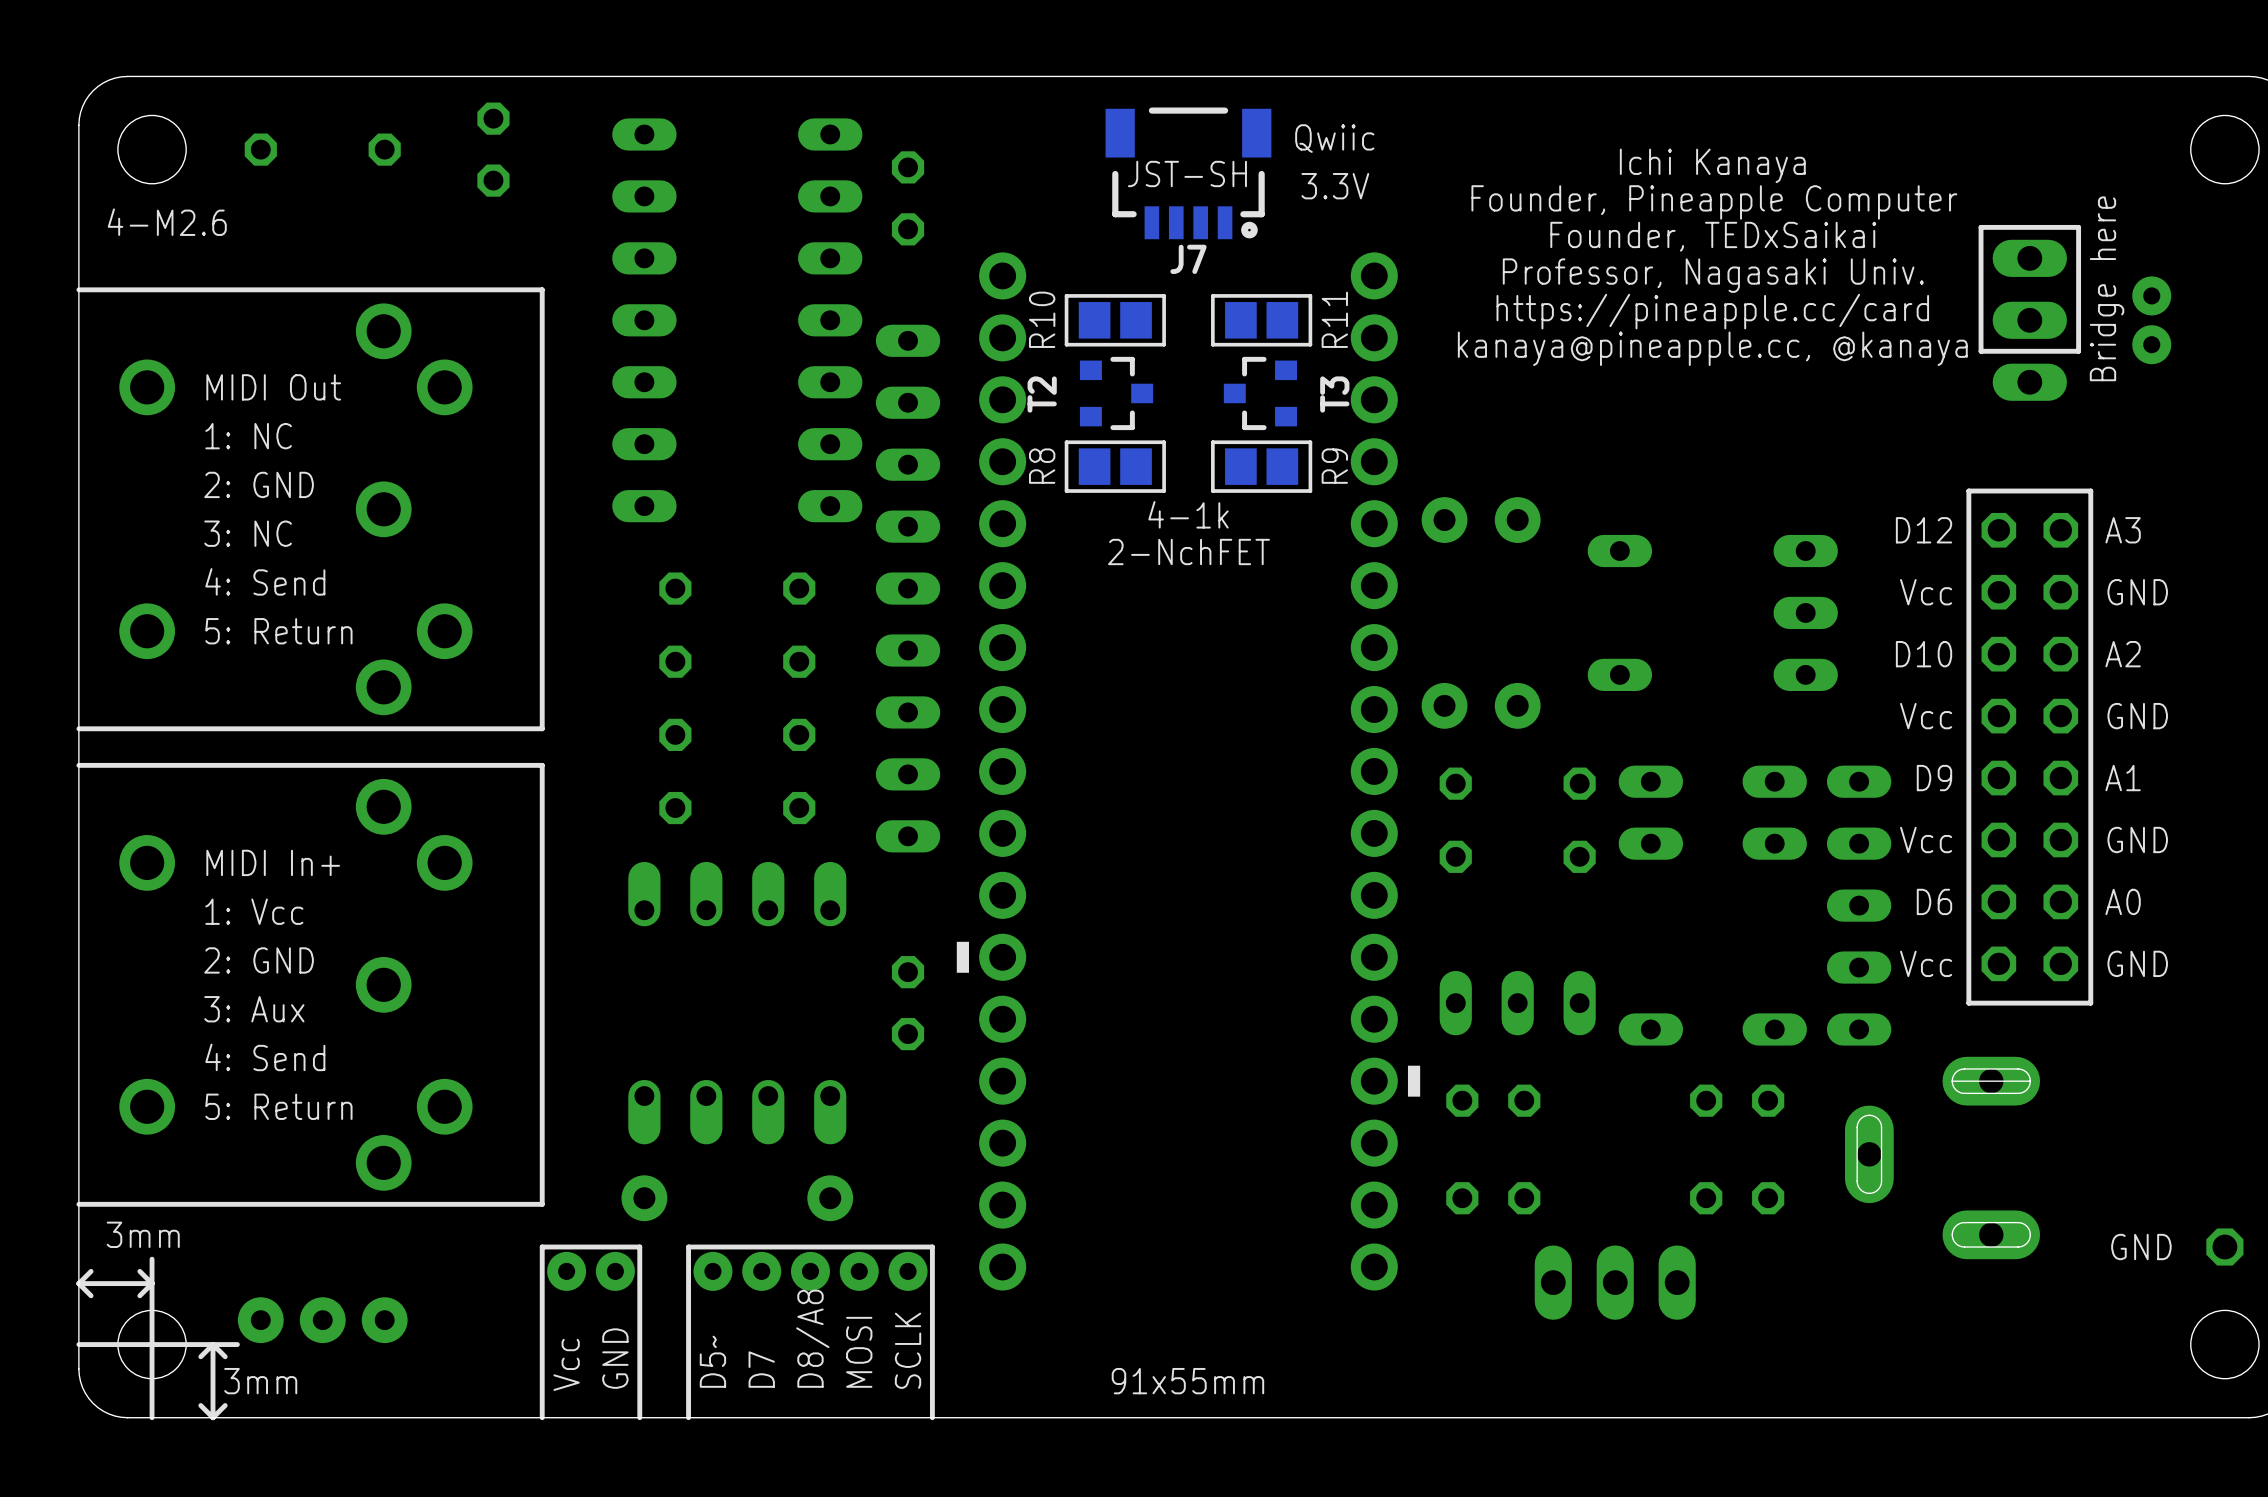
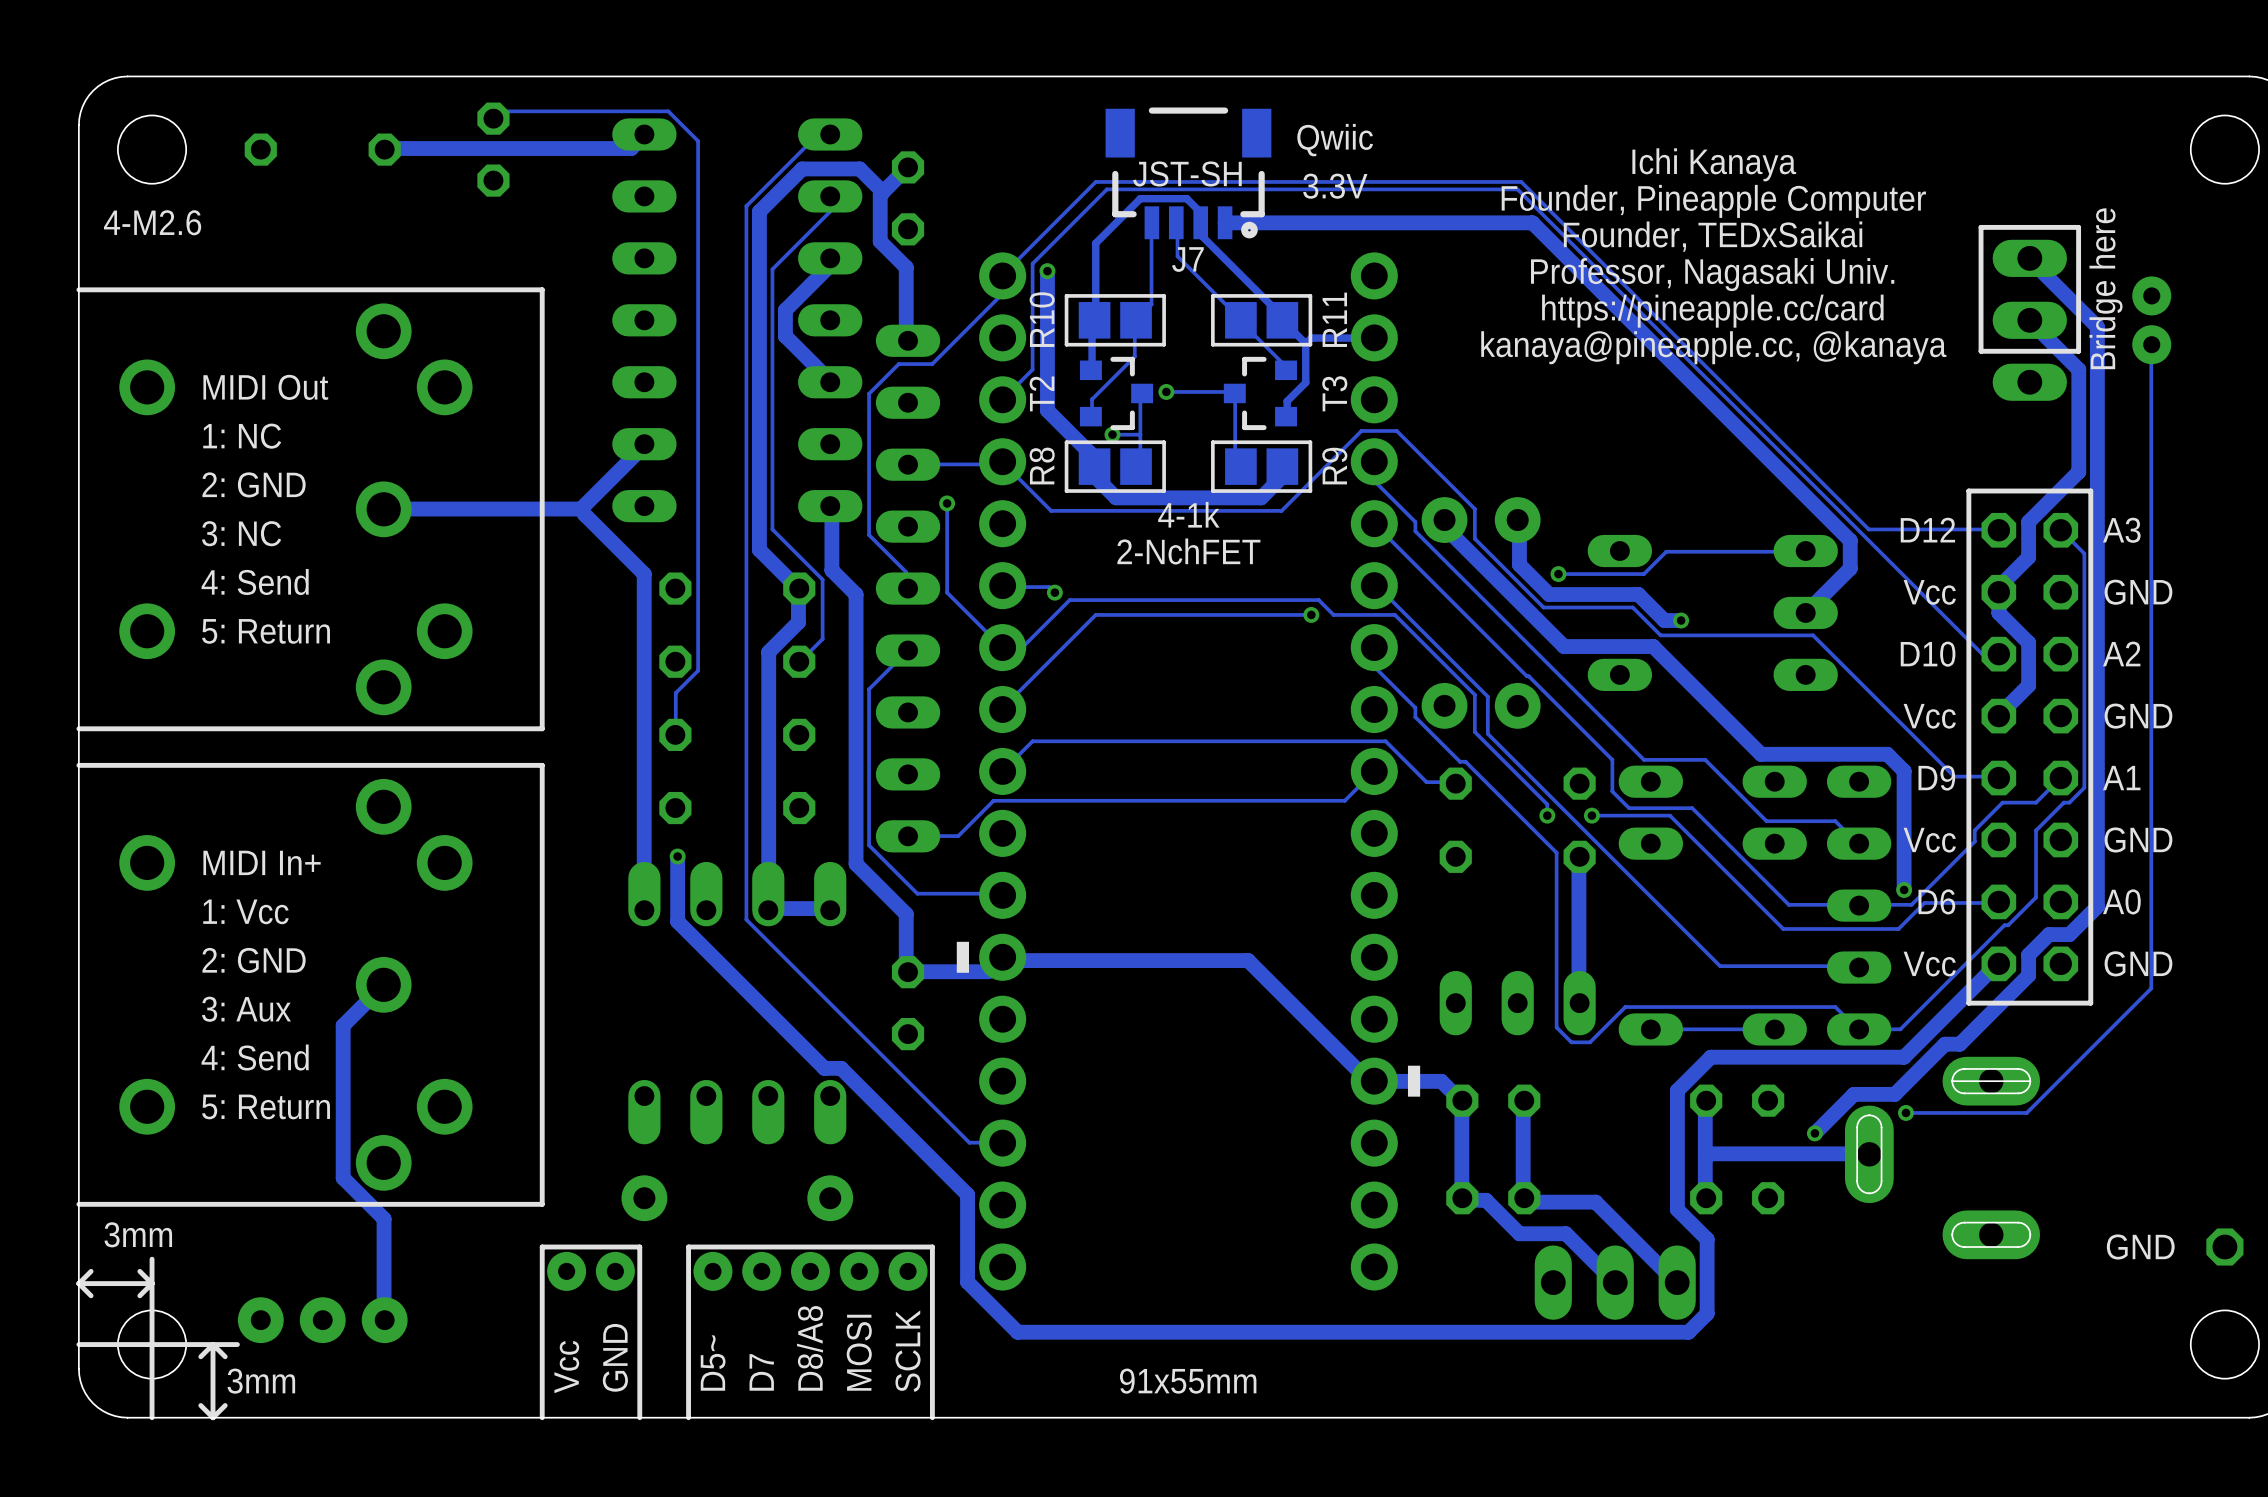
track: none -> (493, 118) (499, 111) (668, 111) (698, 141) (698, 670) (675, 692) (675, 734)
track: none -> (644, 134) (631, 148) (384, 149)
track: none -> (830, 134) (817, 135) (746, 206) (746, 919) (969, 1142) (1002, 1143)
track: none -> (908, 167) (880, 194) (880, 241) (906, 267) (906, 339) (908, 340)
track: none -> (883, 192) (859, 168) (802, 168) (759, 211) (759, 549) (799, 588) (798, 622) (768, 652) (768, 910) (768, 908) (830, 908) (830, 910)
track: none -> (830, 196) (830, 211) (772, 269) (772, 529) (822, 579) (822, 639) (799, 661)
track: none -> (1151, 222) (1151, 304) (1134, 321) (1134, 356) (1092, 399) (1090, 416)
track: none -> (1176, 222) (1177, 256) (1285, 365) (1286, 370)
track: none -> (1225, 222) (1532, 222) (1850, 540) (1850, 568) (1805, 612)
track: none -> (830, 258) (830, 265) (785, 310) (785, 336) (830, 382)
track: none -> (2029, 258) (2097, 326) (2097, 906) (2069, 934) (2049, 934) (2028, 955) (2028, 975) (1959, 1044) (1945, 1044) (1894, 1094) (1853, 1094) (1814, 1133)
track: none -> (1047, 271) (1047, 410) (1090, 453) (1090, 460) (1095, 468) (1095, 477) (1116, 497) (1261, 497) (1281, 477) (1282, 466)
via: none -> (1047, 271)
track: none -> (2029, 320) (2078, 369) (2078, 471) (2028, 522) (2028, 557) (2000, 585) (1998, 592)
track: none -> (1374, 337) (1311, 338) (1305, 343)
track: none -> (1305, 343) (1305, 382) (1287, 401) (1286, 416)
track: none -> (1305, 343) (1282, 320) (1283, 317) (1201, 235) (1199, 211) (1186, 198) (1140, 198) (1095, 243) (1095, 317) (1092, 323) (1090, 370)
track: none -> (2151, 344) (2151, 988) (2026, 1112) (1905, 1112)
track: none -> (1166, 391) (1234, 393)
via: none -> (1166, 391)
track: none -> (1142, 393) (1140, 393) (1140, 462) (1136, 466)
track: none -> (1235, 393) (1235, 460) (1240, 466)
track: none -> (1002, 399) (1032, 369) (1032, 263) (1106, 189) (1517, 189) (1982, 653) (1998, 654)
via: none -> (1112, 434)
track: none -> (1140, 434) (1112, 434)
track: none -> (644, 444) (581, 509)
track: none -> (1374, 461) (1374, 481) (1415, 522) (1415, 531) (1643, 759) (1705, 759) (1766, 821) (1835, 821) (1859, 843)
track: none -> (908, 464) (999, 464) (1002, 461) (1051, 510) (1281, 510) (1361, 430) (1396, 430) (1474, 509) (1474, 538) (1543, 607) (1632, 607) (1660, 635) (1813, 635) (1954, 776) (1998, 778)
track: none -> (947, 503) (947, 592) (1002, 647) (1023, 646) (1069, 600) (1318, 600) (1333, 614) (1394, 614) (1474, 694) (1474, 732) (1547, 804) (1547, 815)
via: none -> (947, 503)
track: none -> (830, 506) (831, 507) (831, 570) (856, 594) (856, 863) (906, 914) (906, 964) (908, 972)
track: none -> (581, 509) (384, 509)
track: none -> (581, 509) (644, 574) (644, 910)
track: none -> (1444, 520) (1445, 527) (1564, 646) (1653, 646) (1761, 754) (1887, 754) (1904, 771) (1904, 889)
track: none -> (1517, 520) (1519, 520) (1519, 564) (1549, 594) (1638, 594) (1664, 620) (1681, 620)
track: none -> (1374, 523) (1612, 759) (1612, 791) (1629, 808) (1692, 808) (1788, 904) (1911, 904) (1974, 841) (1974, 830) (2002, 802) (2036, 802) (2060, 778)
track: none -> (1998, 530) (1868, 529) (1521, 181) (1095, 181) (1001, 276) (1001, 295) (932, 364) (898, 364) (869, 393) (869, 535) (906, 572) (906, 587) (908, 588)
track: none -> (2060, 530) (2084, 553) (2084, 787) (2069, 802) (2063, 802) (2036, 830) (2036, 897) (2008, 925) (2004, 925) (1900, 1029) (1859, 1029)
track: none -> (1805, 551) (1666, 551) (1643, 574) (1558, 574)
via: none -> (1558, 574)
track: none -> (1002, 585) (1049, 587) (1054, 592)
track: none -> (1374, 585) (1378, 587) (1487, 696) (1487, 733) (1720, 966) (1859, 967)
via: none -> (1054, 592)
track: none -> (1998, 592) (1998, 613) (2028, 642) (2028, 685) (1998, 716)
track: none -> (1311, 614) (1095, 614) (1002, 709)
via: none -> (1311, 614)
via: none -> (1681, 620)
track: none -> (1374, 647) (1374, 666) (1415, 707) (1415, 717) (1459, 761) (1465, 761) (1556, 852) (1556, 1027) (1571, 1042) (1590, 1042) (1625, 1007) (1835, 1007) (1859, 1029)
track: none -> (908, 650) (869, 689) (869, 845) (917, 893) (1001, 893) (1002, 895)
track: none -> (1002, 771) (1032, 741) (1385, 741) (1426, 782) (1455, 783)
track: none -> (1374, 771) (1344, 800) (993, 800) (958, 836) (908, 836)
via: none -> (1547, 815)
track: none -> (1591, 815) (1669, 815) (1783, 928) (1898, 928) (1924, 902) (1998, 901)
via: none -> (1591, 815)
track: none -> (677, 856) (677, 921) (824, 1068) (841, 1068) (967, 1194) (967, 1282) (1017, 1332) (1688, 1332) (1707, 1313) (1707, 1239) (1677, 1209) (1677, 1090) (1710, 1057) (1904, 1057) (1998, 963)
via: none -> (677, 856)
track: none -> (1579, 856) (1579, 1003)
via: none -> (1904, 889)
track: none -> (908, 971) (987, 971) (1002, 957) (1008, 960) (1248, 960) (1367, 1079) (1374, 1081)
track: none -> (383, 984) (343, 1025) (343, 1177) (384, 1218) (384, 1320)
track: none -> (1774, 1029) (1650, 1029)
track: none -> (1374, 1081) (1441, 1081) (1462, 1100) (1462, 1198) (1486, 1200) (1519, 1233) (1565, 1233) (1615, 1282)
track: none -> (1524, 1100) (1524, 1198) (1530, 1202) (1595, 1202) (1677, 1282)
track: none -> (1706, 1100) (1706, 1198)
via: none -> (1905, 1112)
via: none -> (1814, 1133)
track: none -> (1705, 1153) (1869, 1154)

